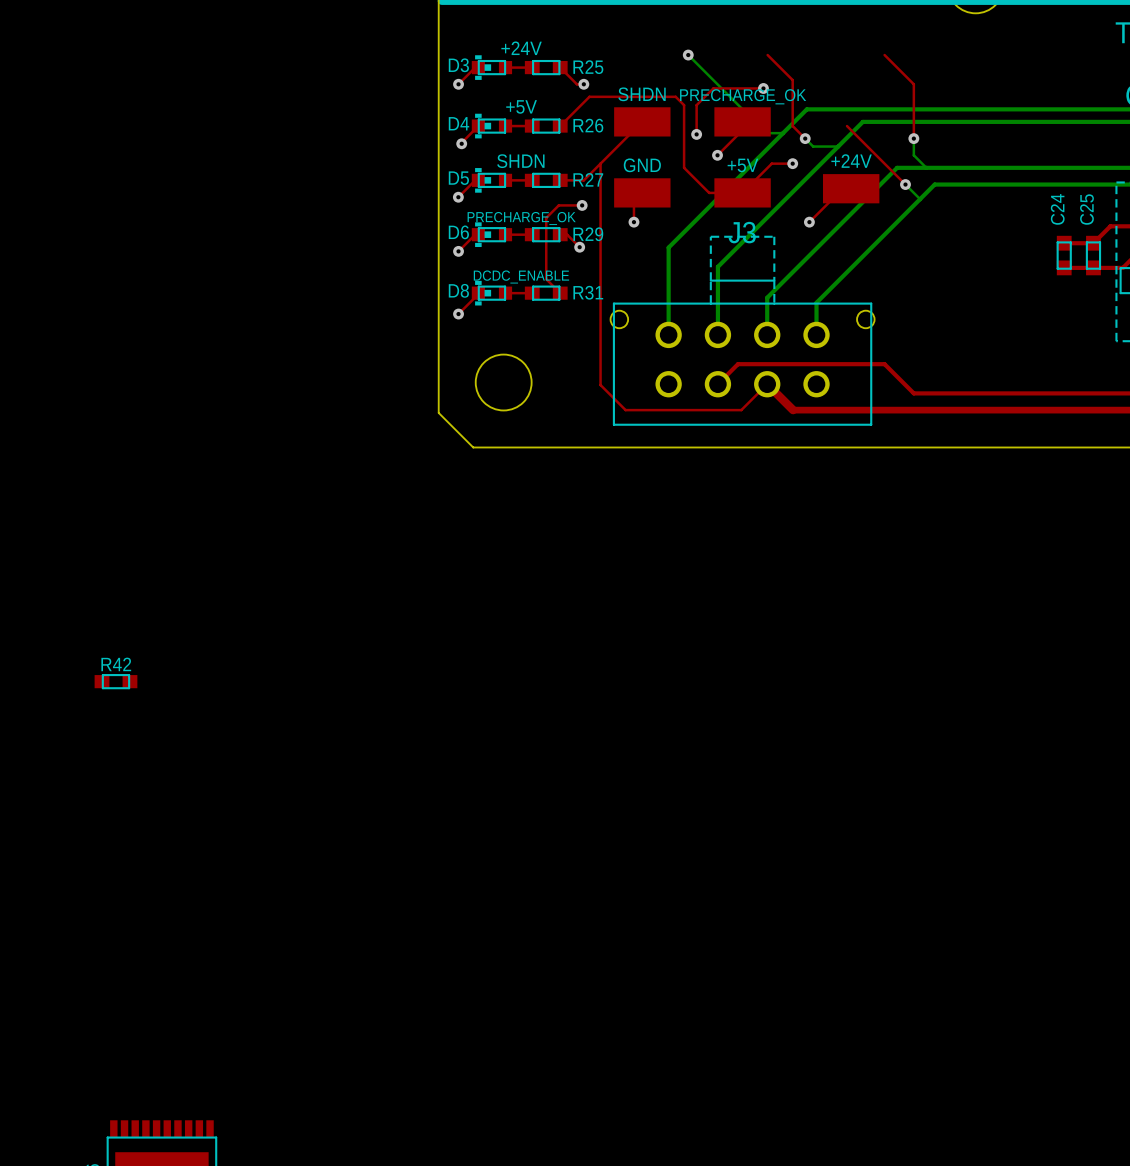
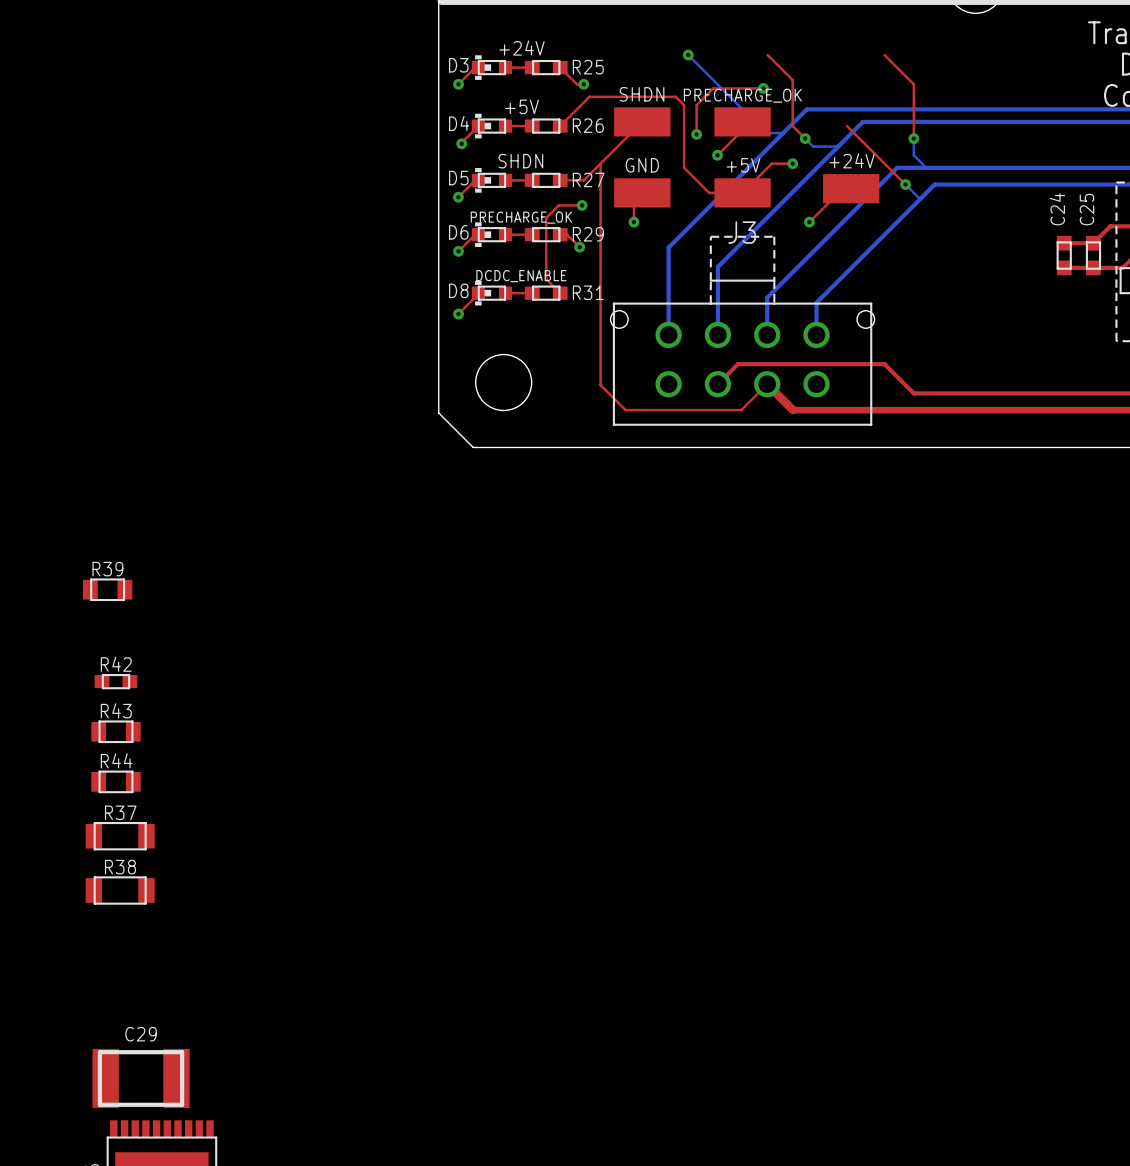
R39: none -> (107, 589)
R43: none -> (115, 731)
R44: none -> (115, 781)
R37: none -> (120, 836)
R38: none -> (120, 890)
C29: none -> (141, 1078)

